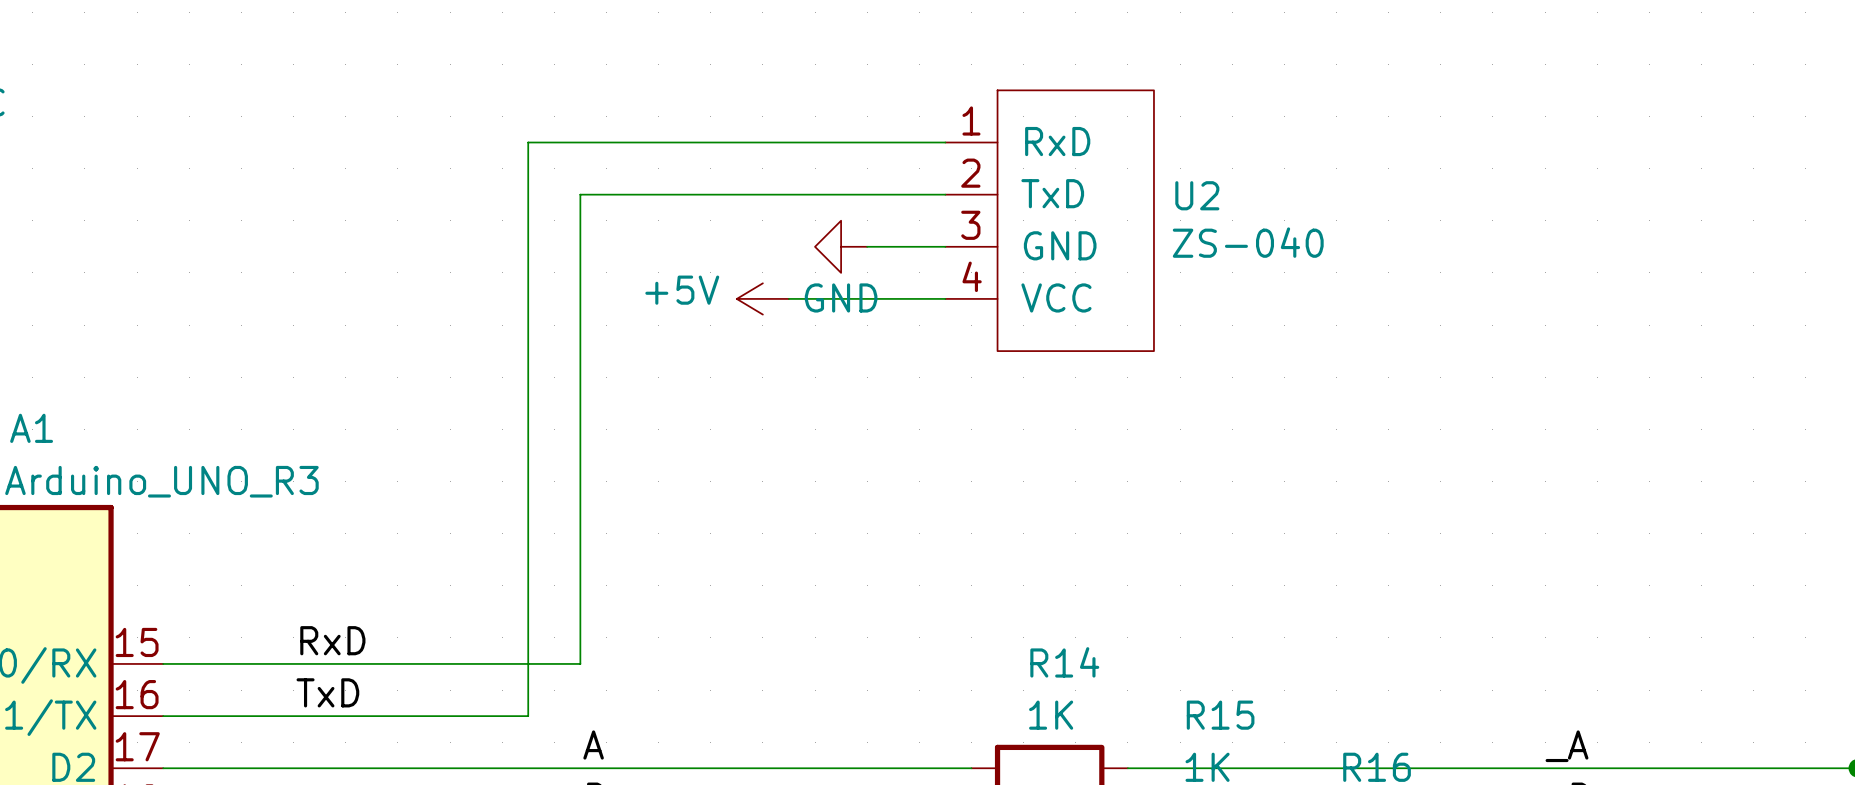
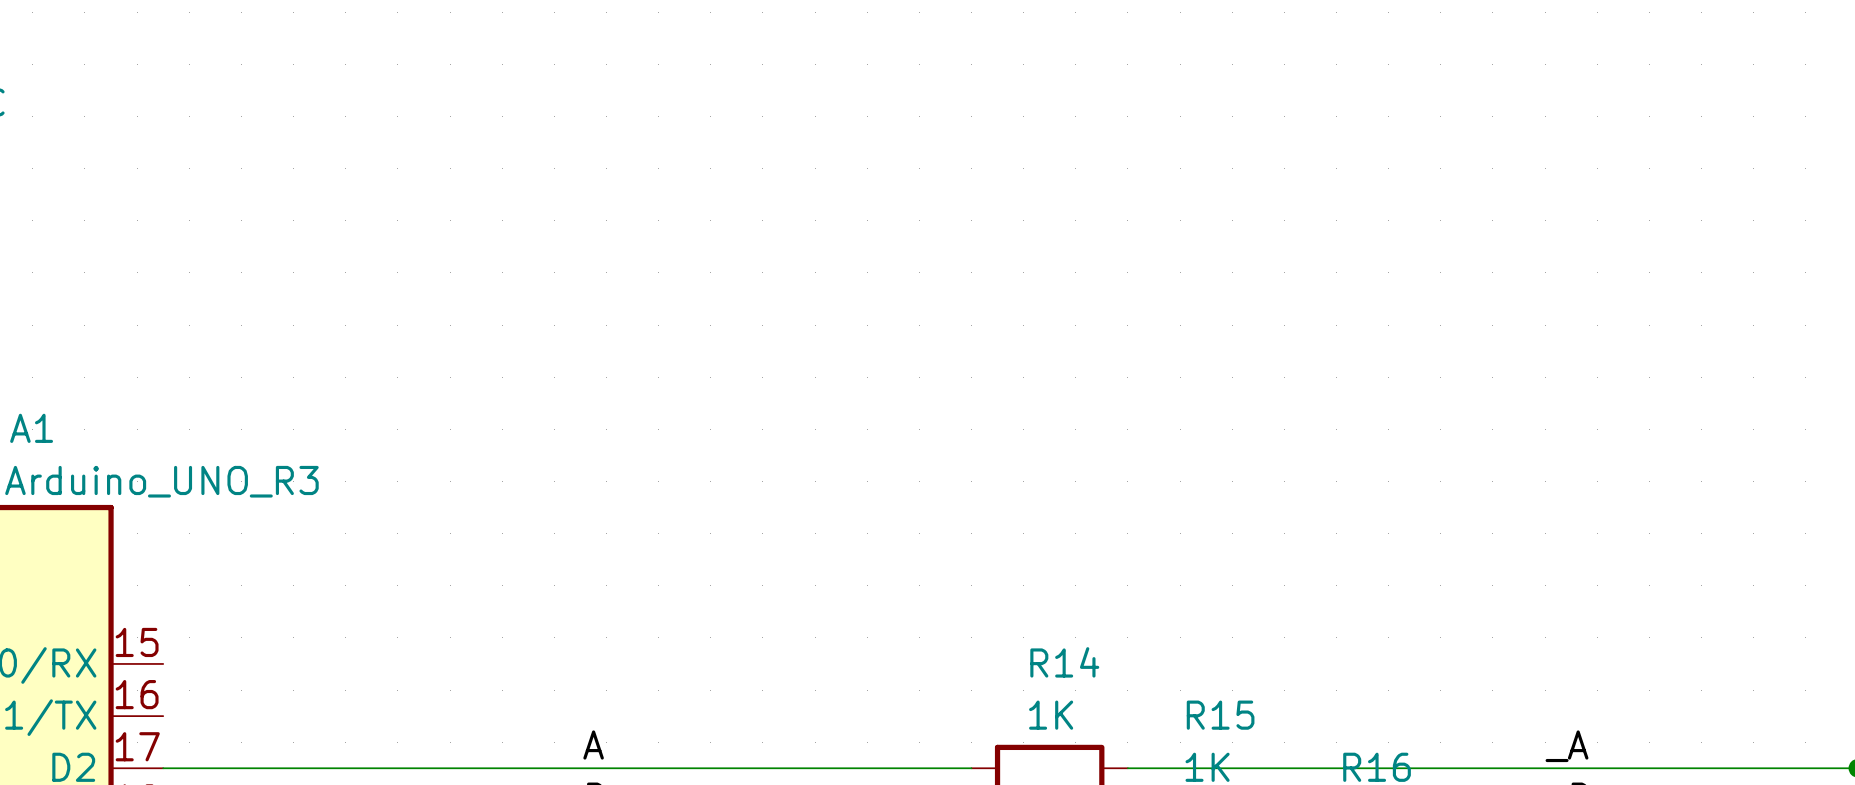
wire: (945, 142) (528, 142) (528, 716) (163, 716) -> none
wire: (945, 194) (580, 194) (580, 663) (163, 663) -> none
U2: ZS-040 (1049, 220) -> none
power symbol: GND (841, 246) -> none
wire: (867, 246) (945, 246) -> none
power symbol: +5V (762, 298) -> none
wire: (788, 298) (945, 298) -> none
label: RxD (332, 640) -> none
label: TxD (327, 692) -> none

